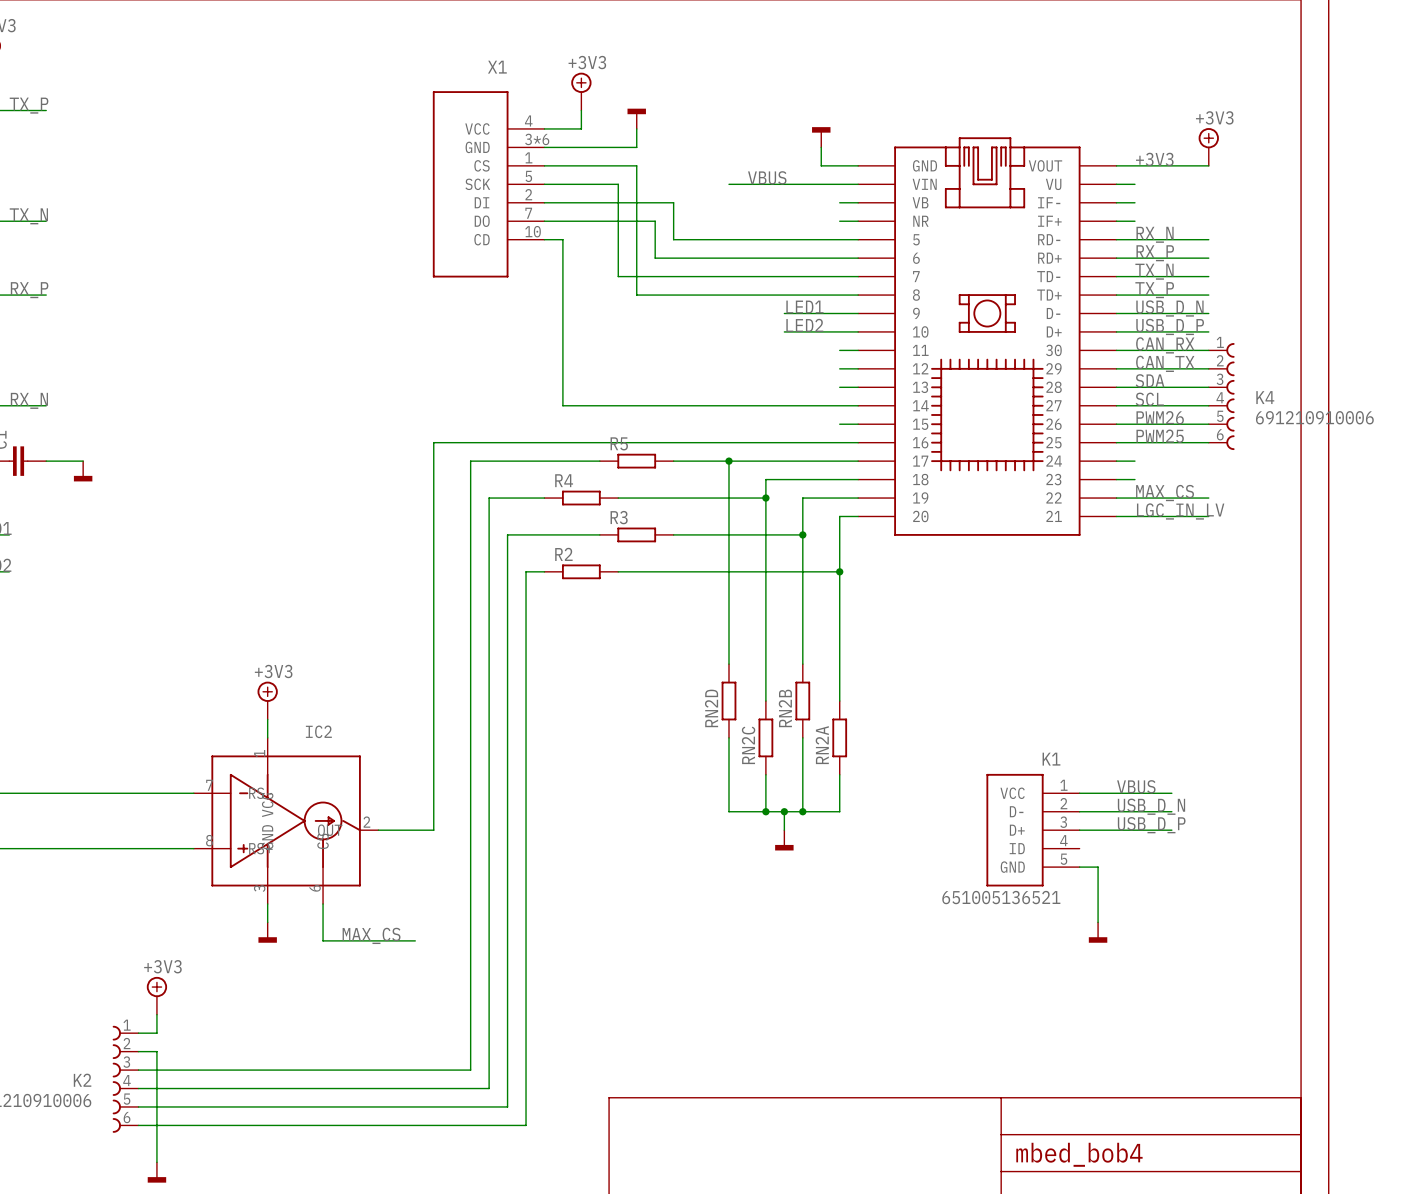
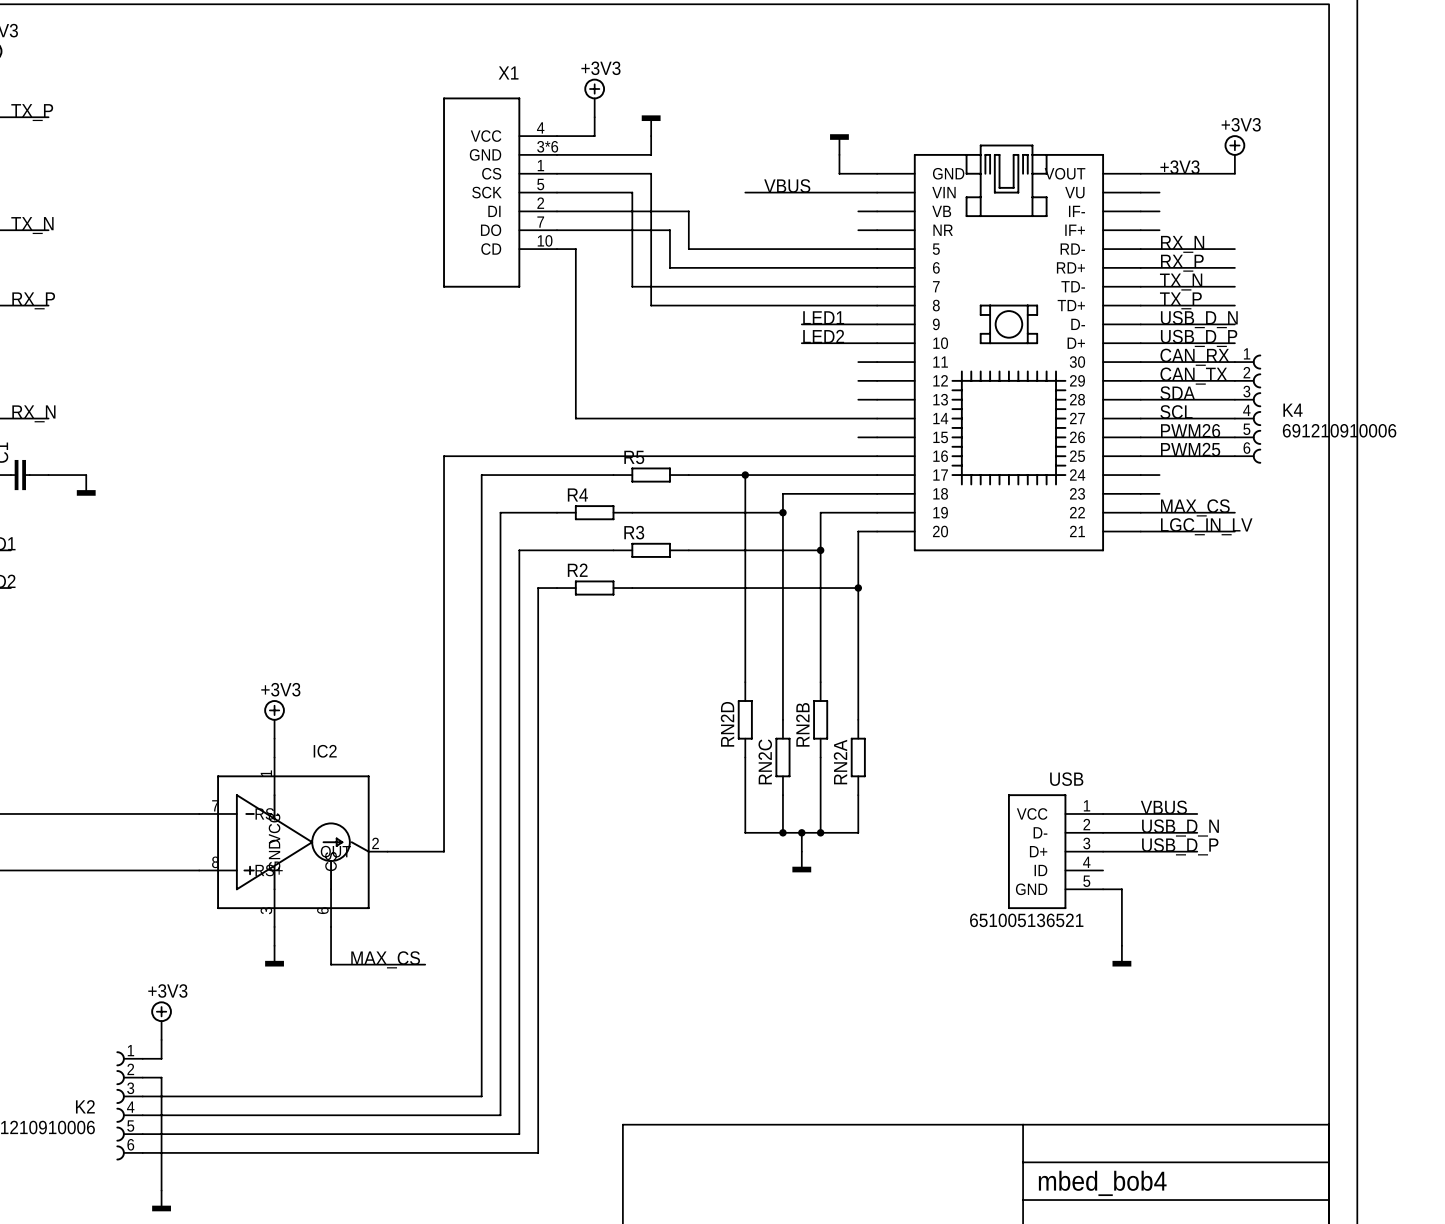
K1 name: K1 (1051, 759) -> USB (1066, 779)

